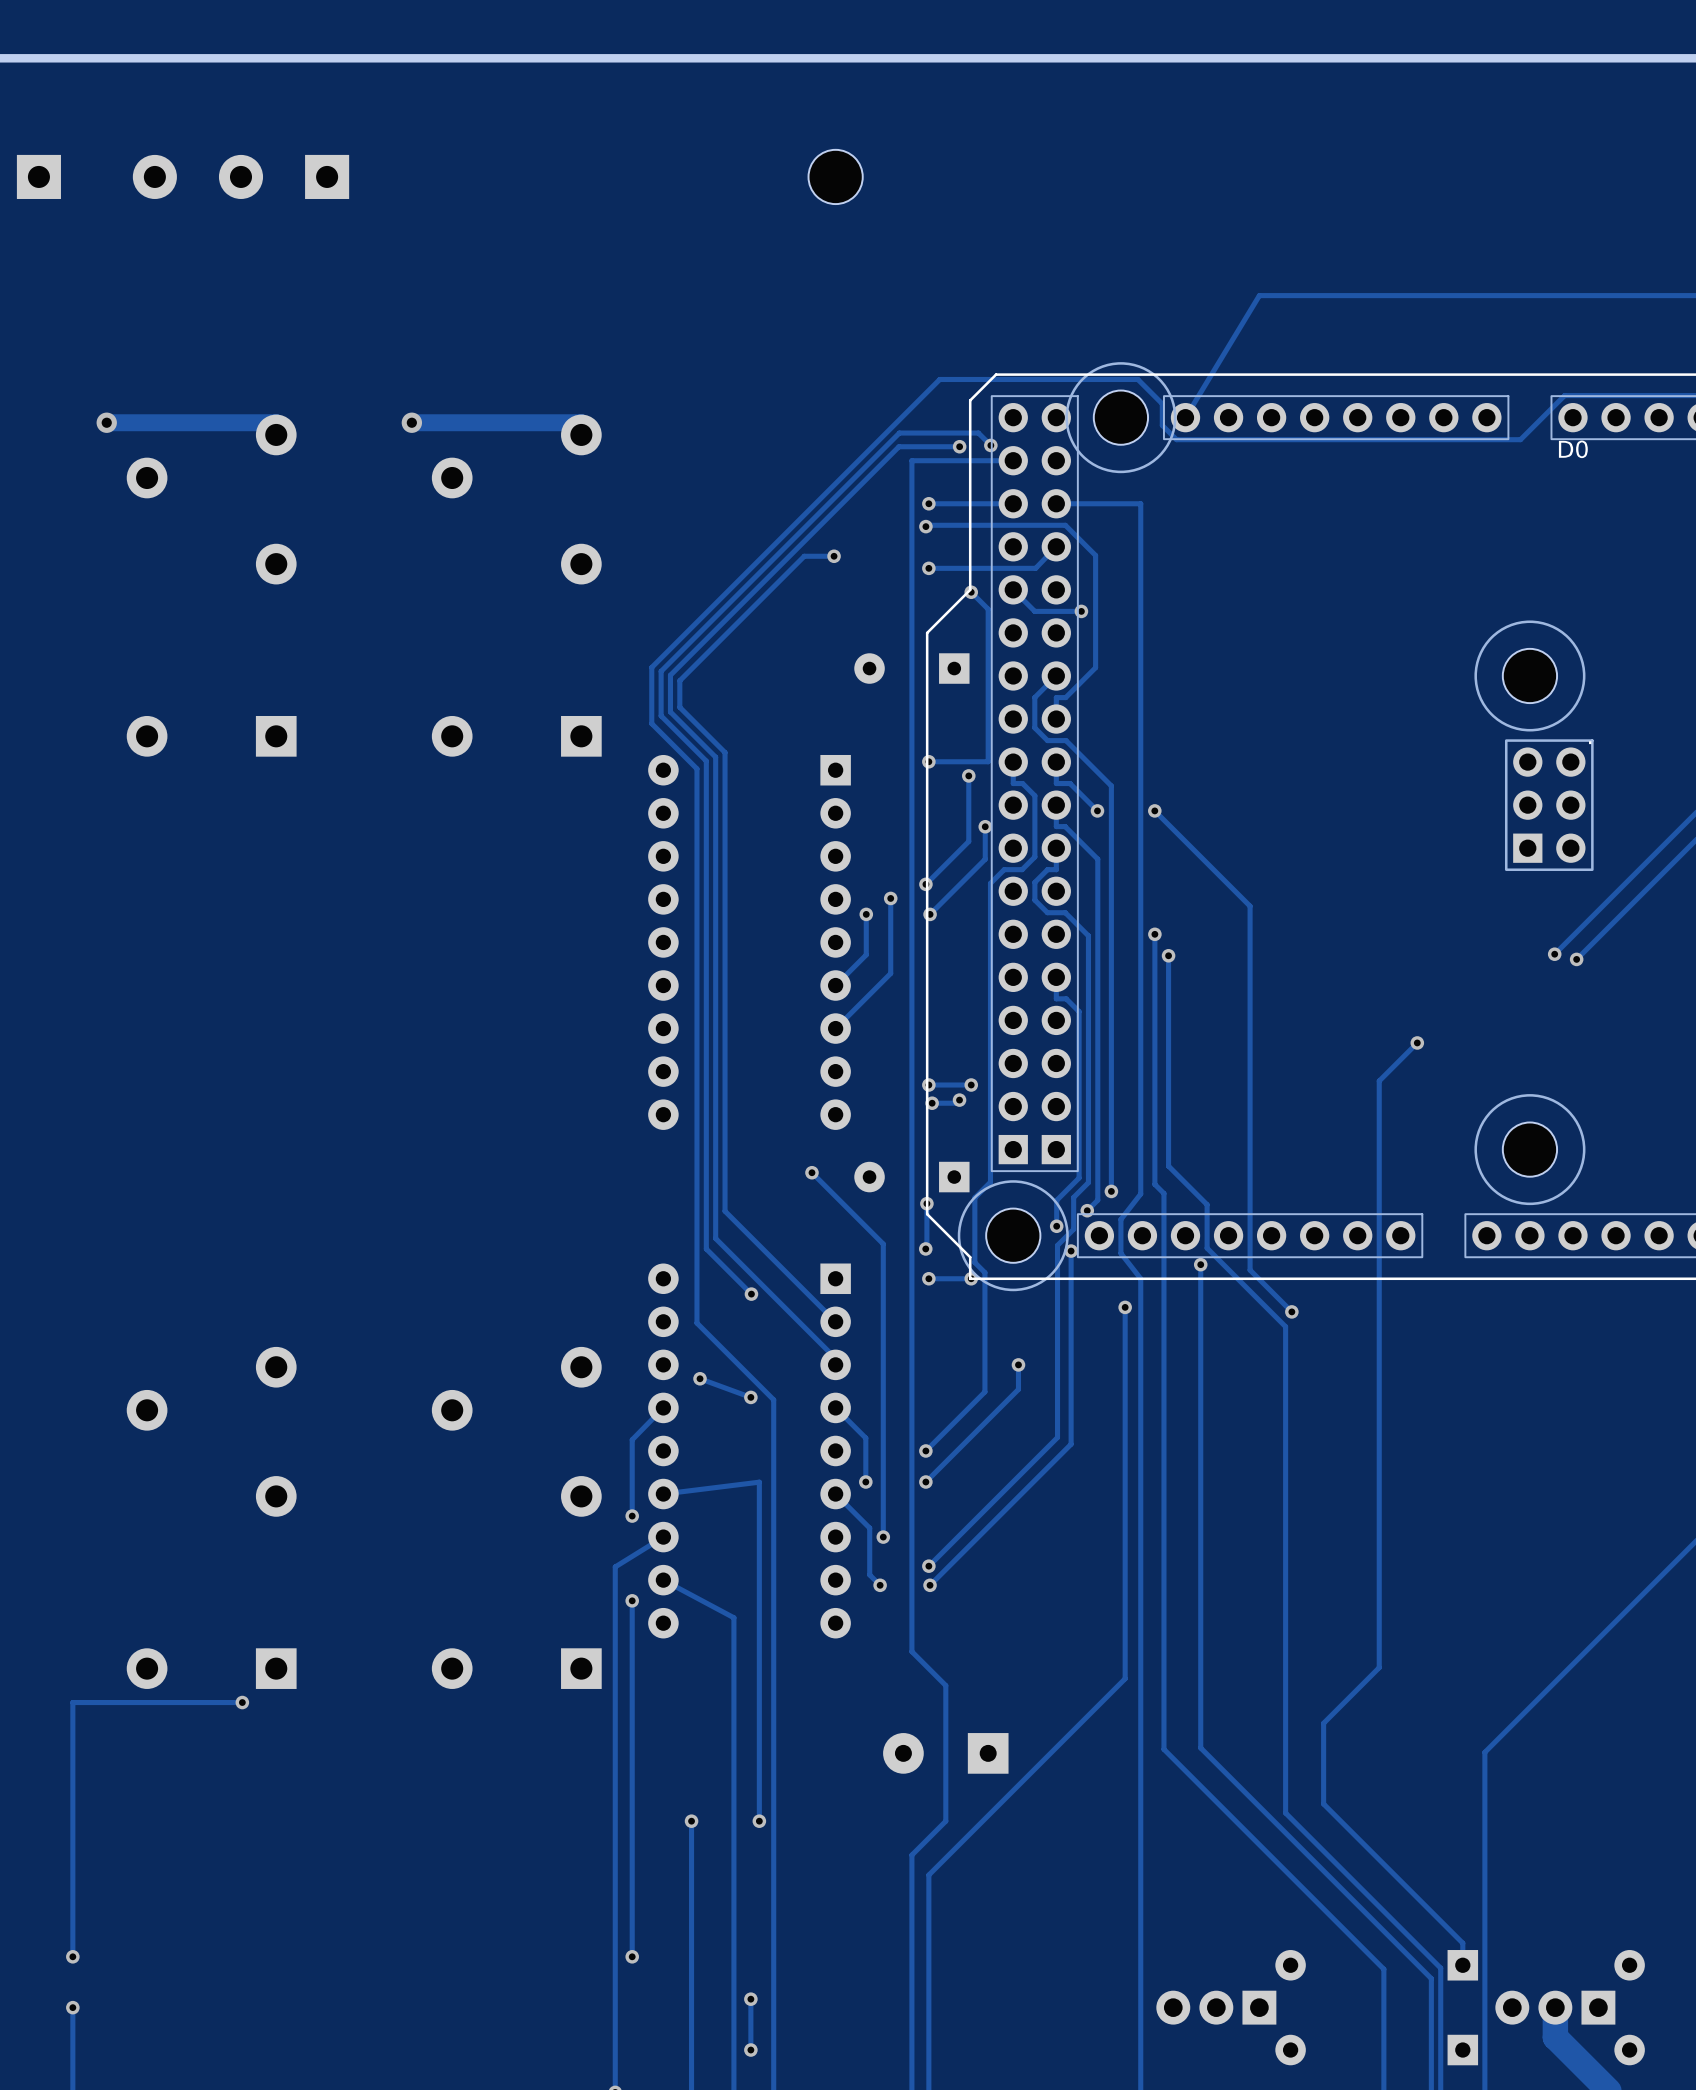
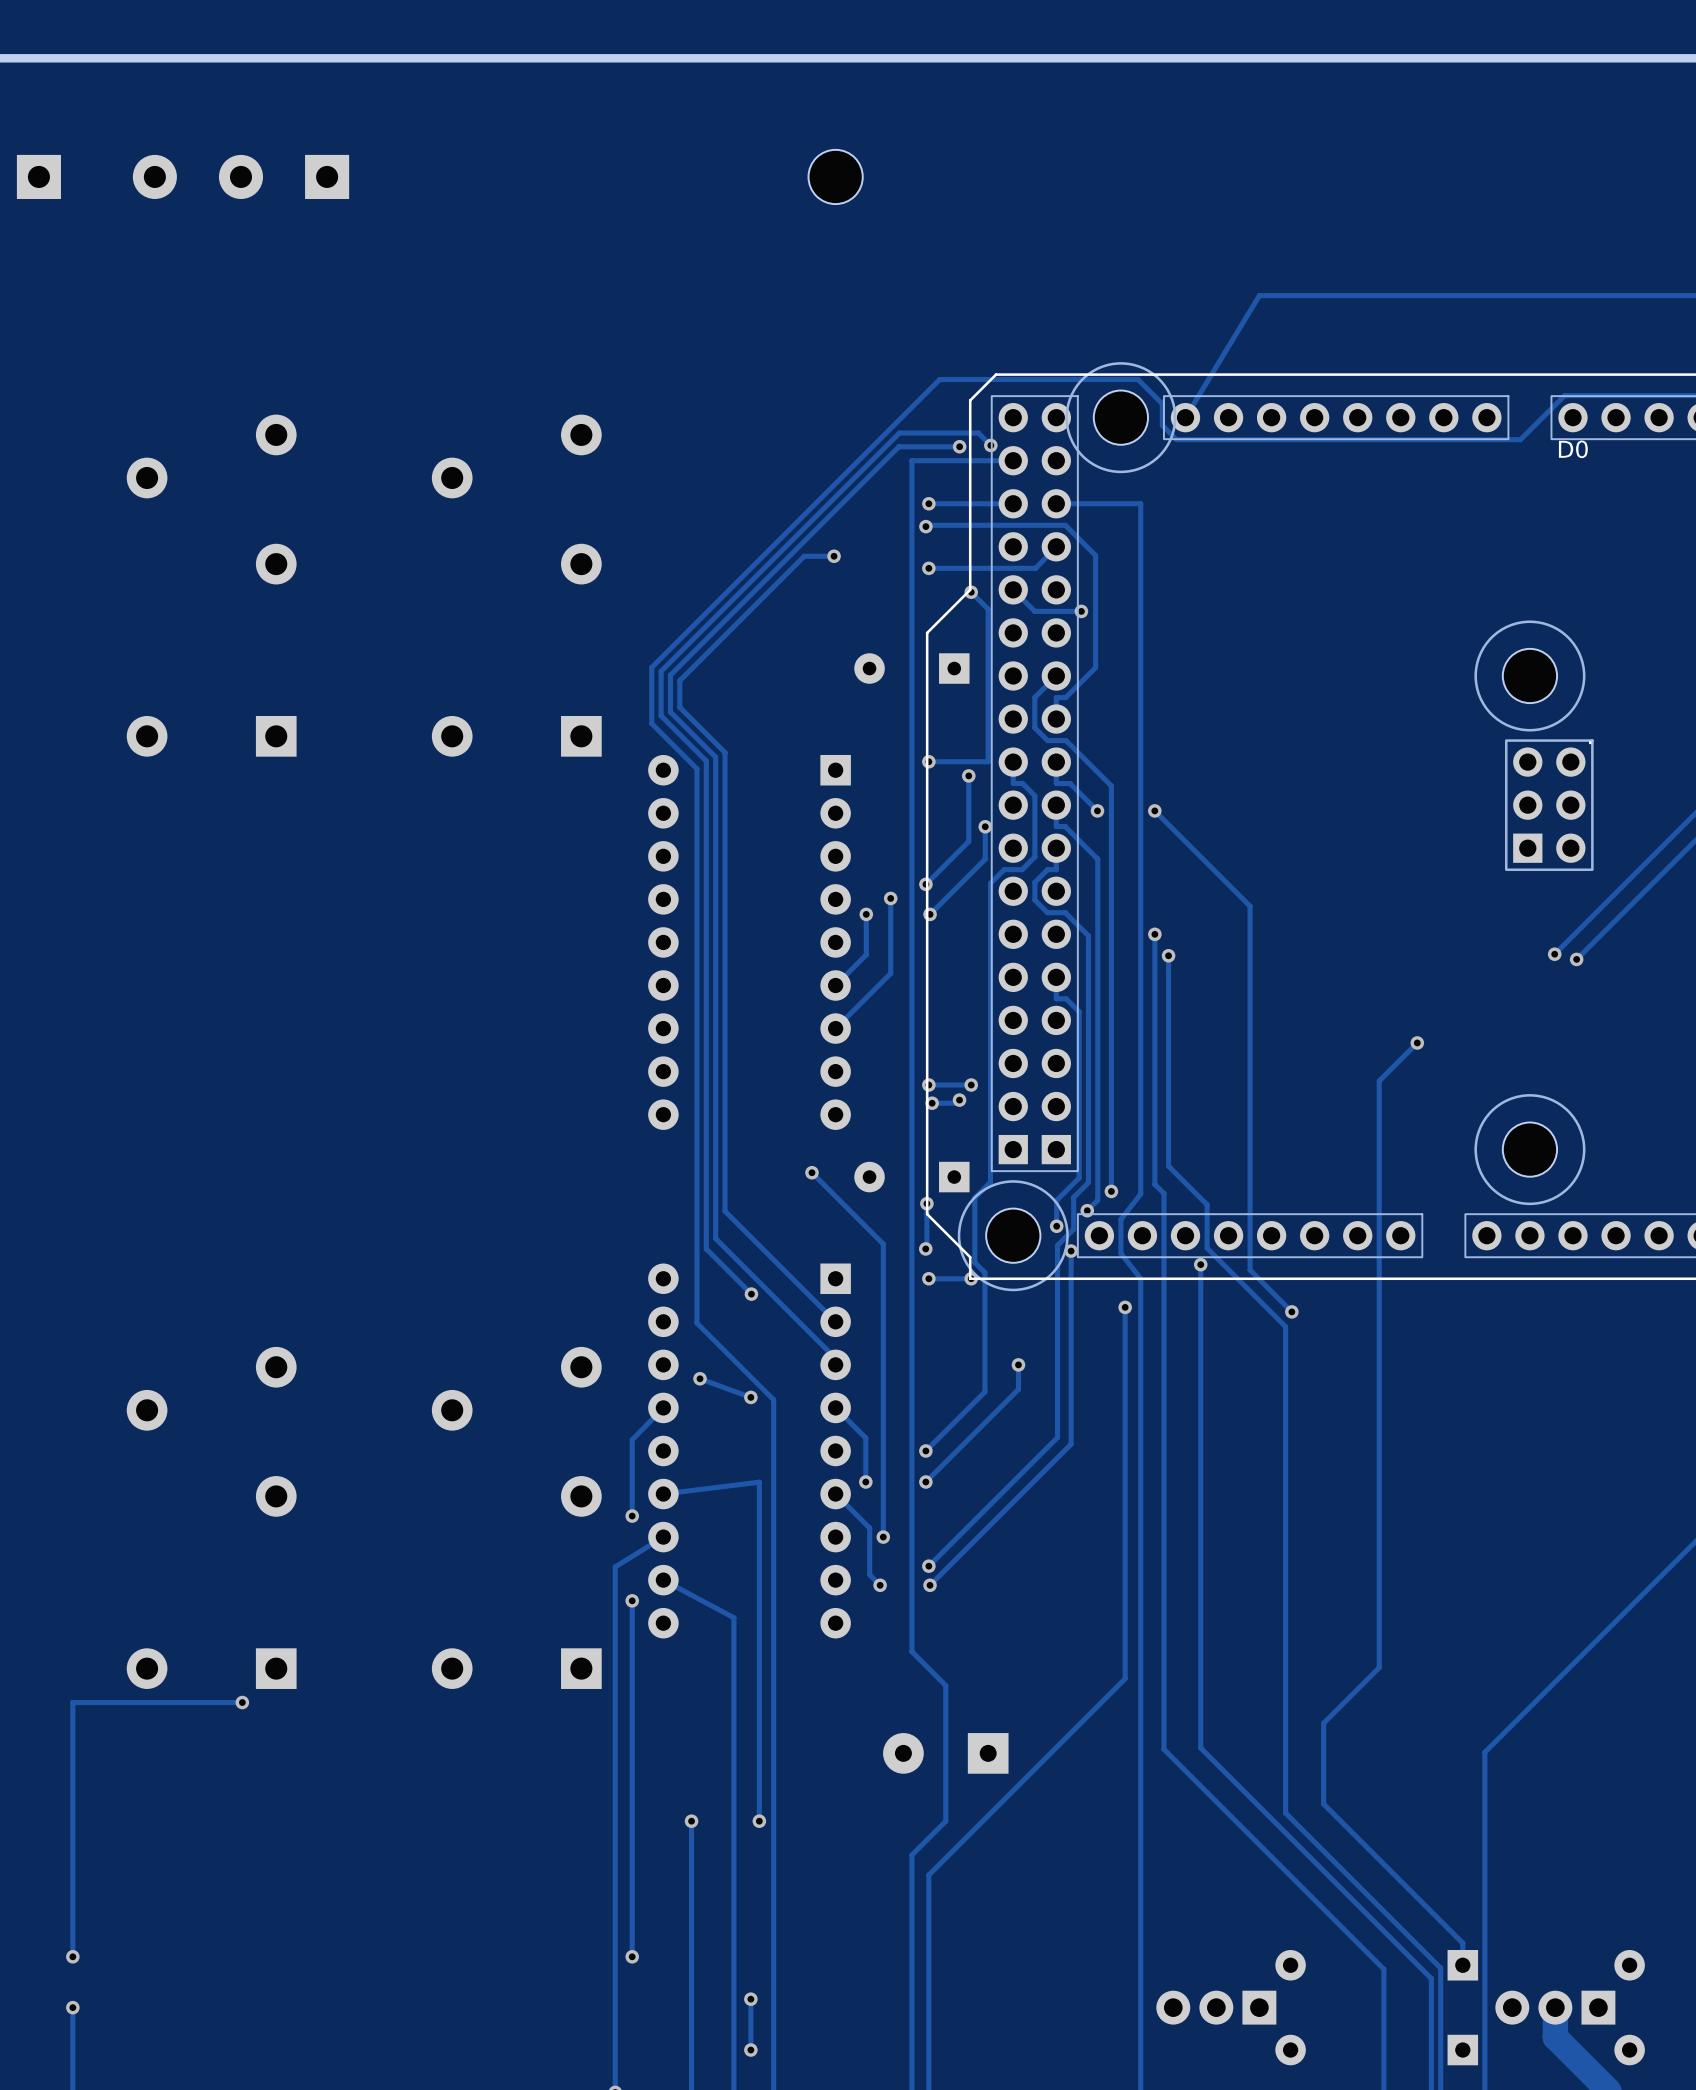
track: (106, 422) (276, 422) (276, 431) -> none
via: (106, 422) -> none
track: (411, 422) (581, 422) (581, 431) -> none
via: (411, 422) -> none

